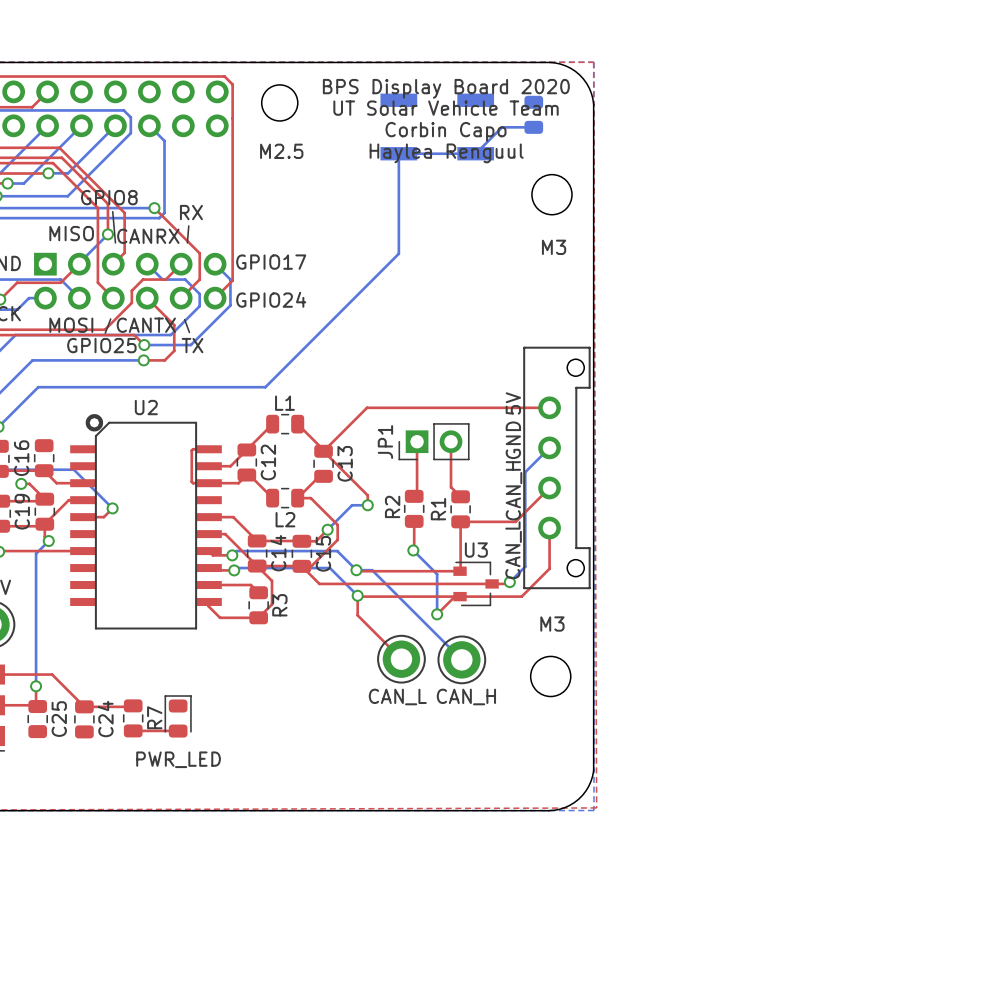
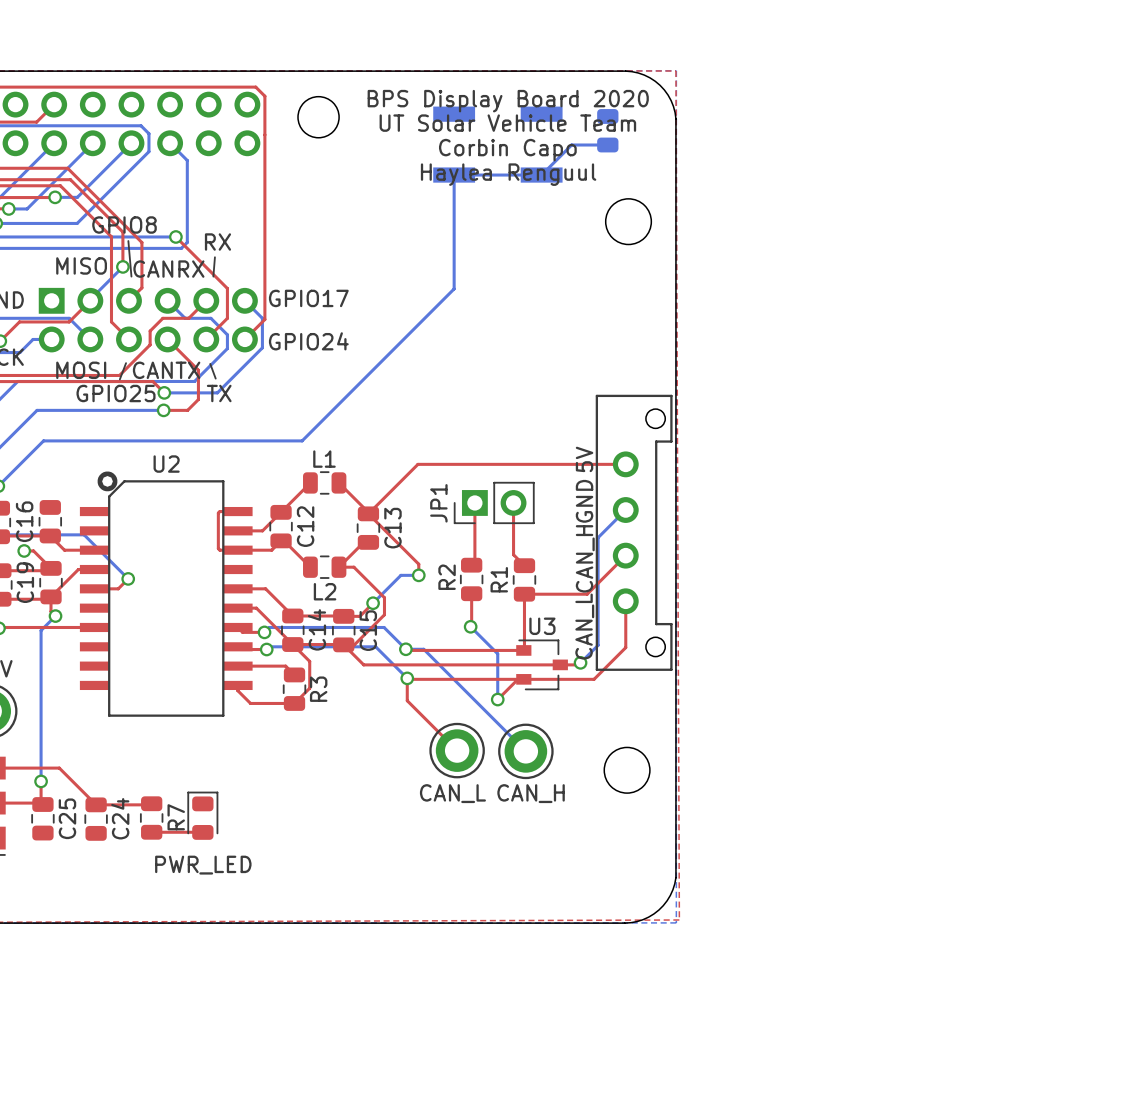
text: M2.5 (281, 151) -> none
text: M3 (554, 247) -> none
text: M3 (552, 624) -> none

